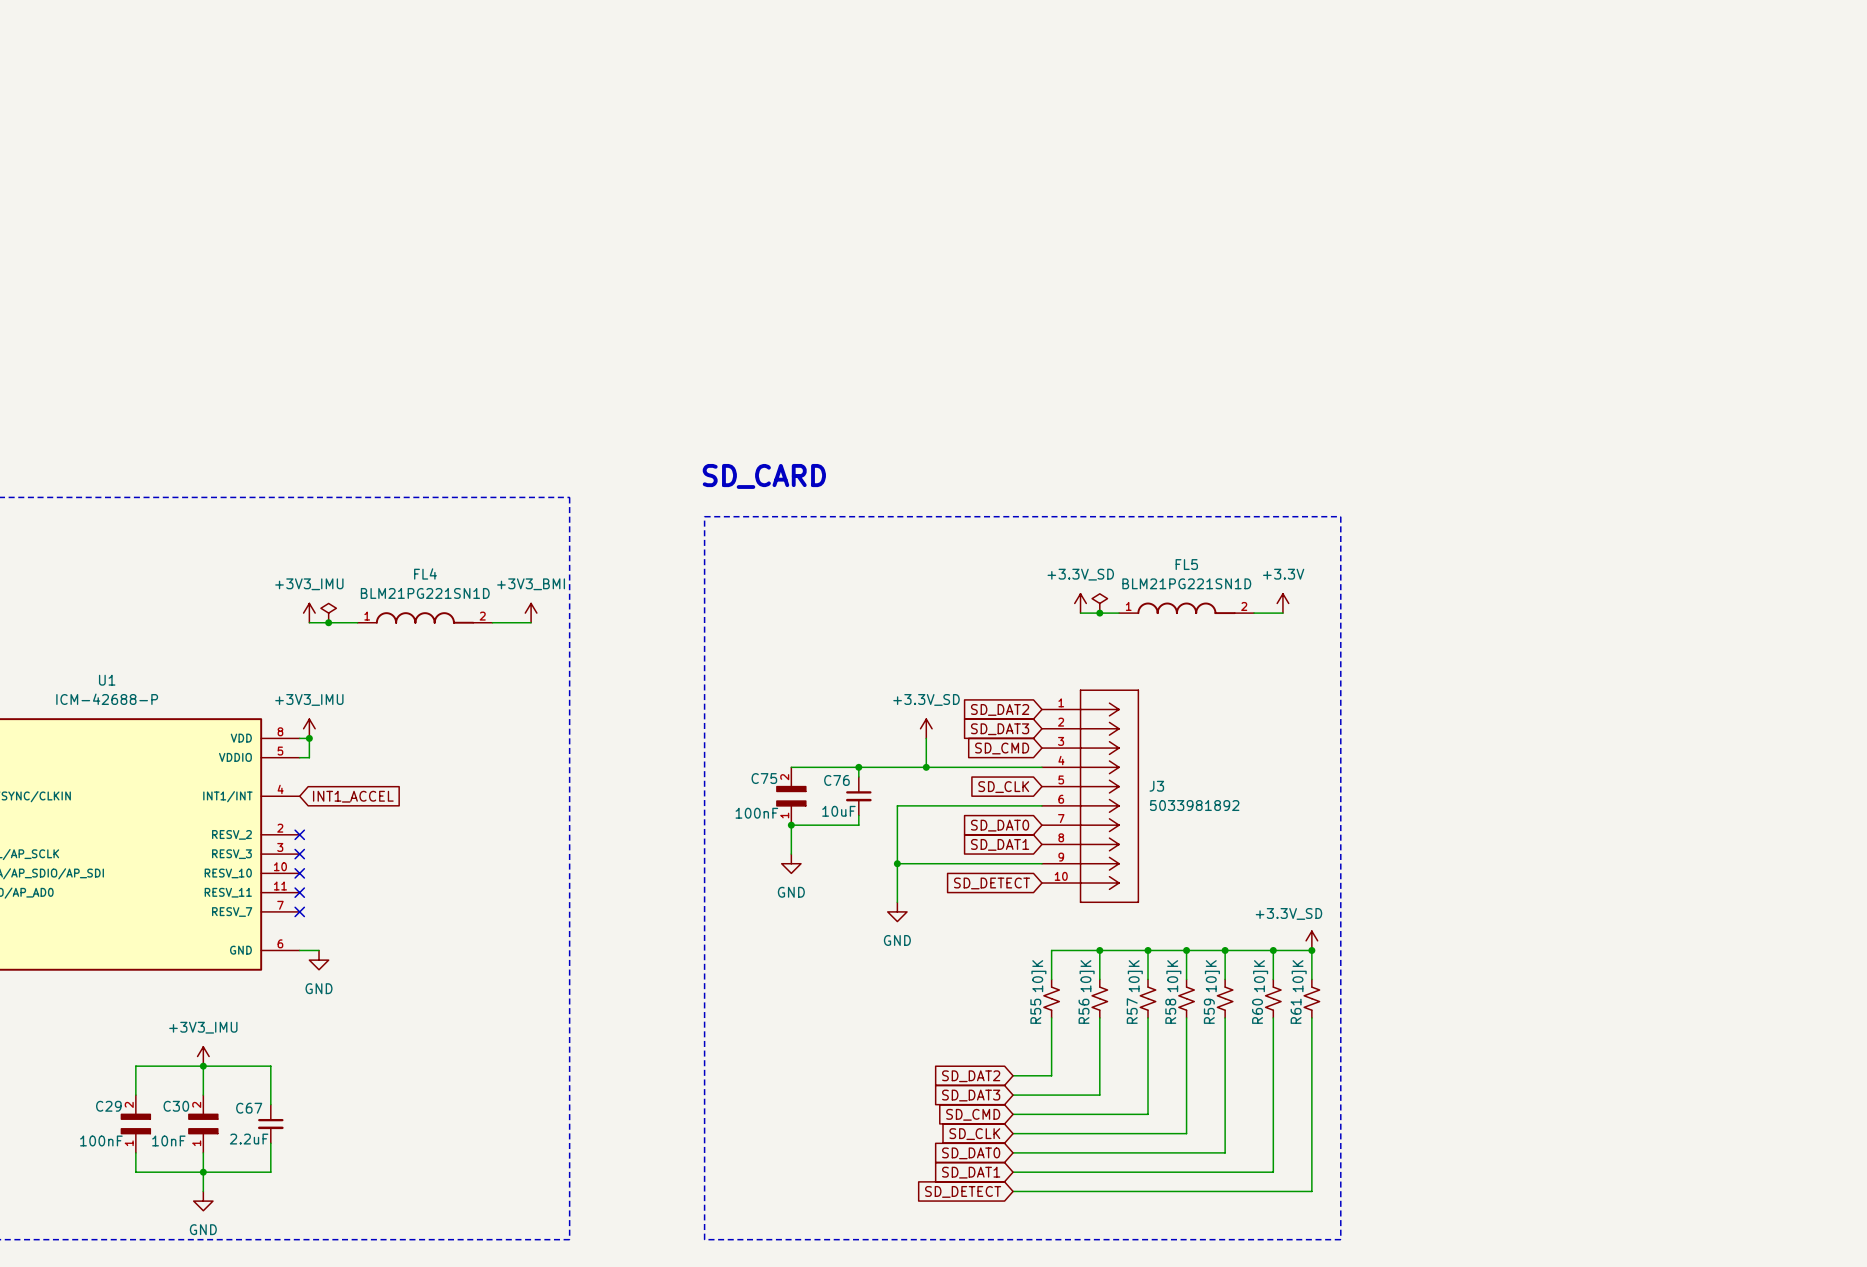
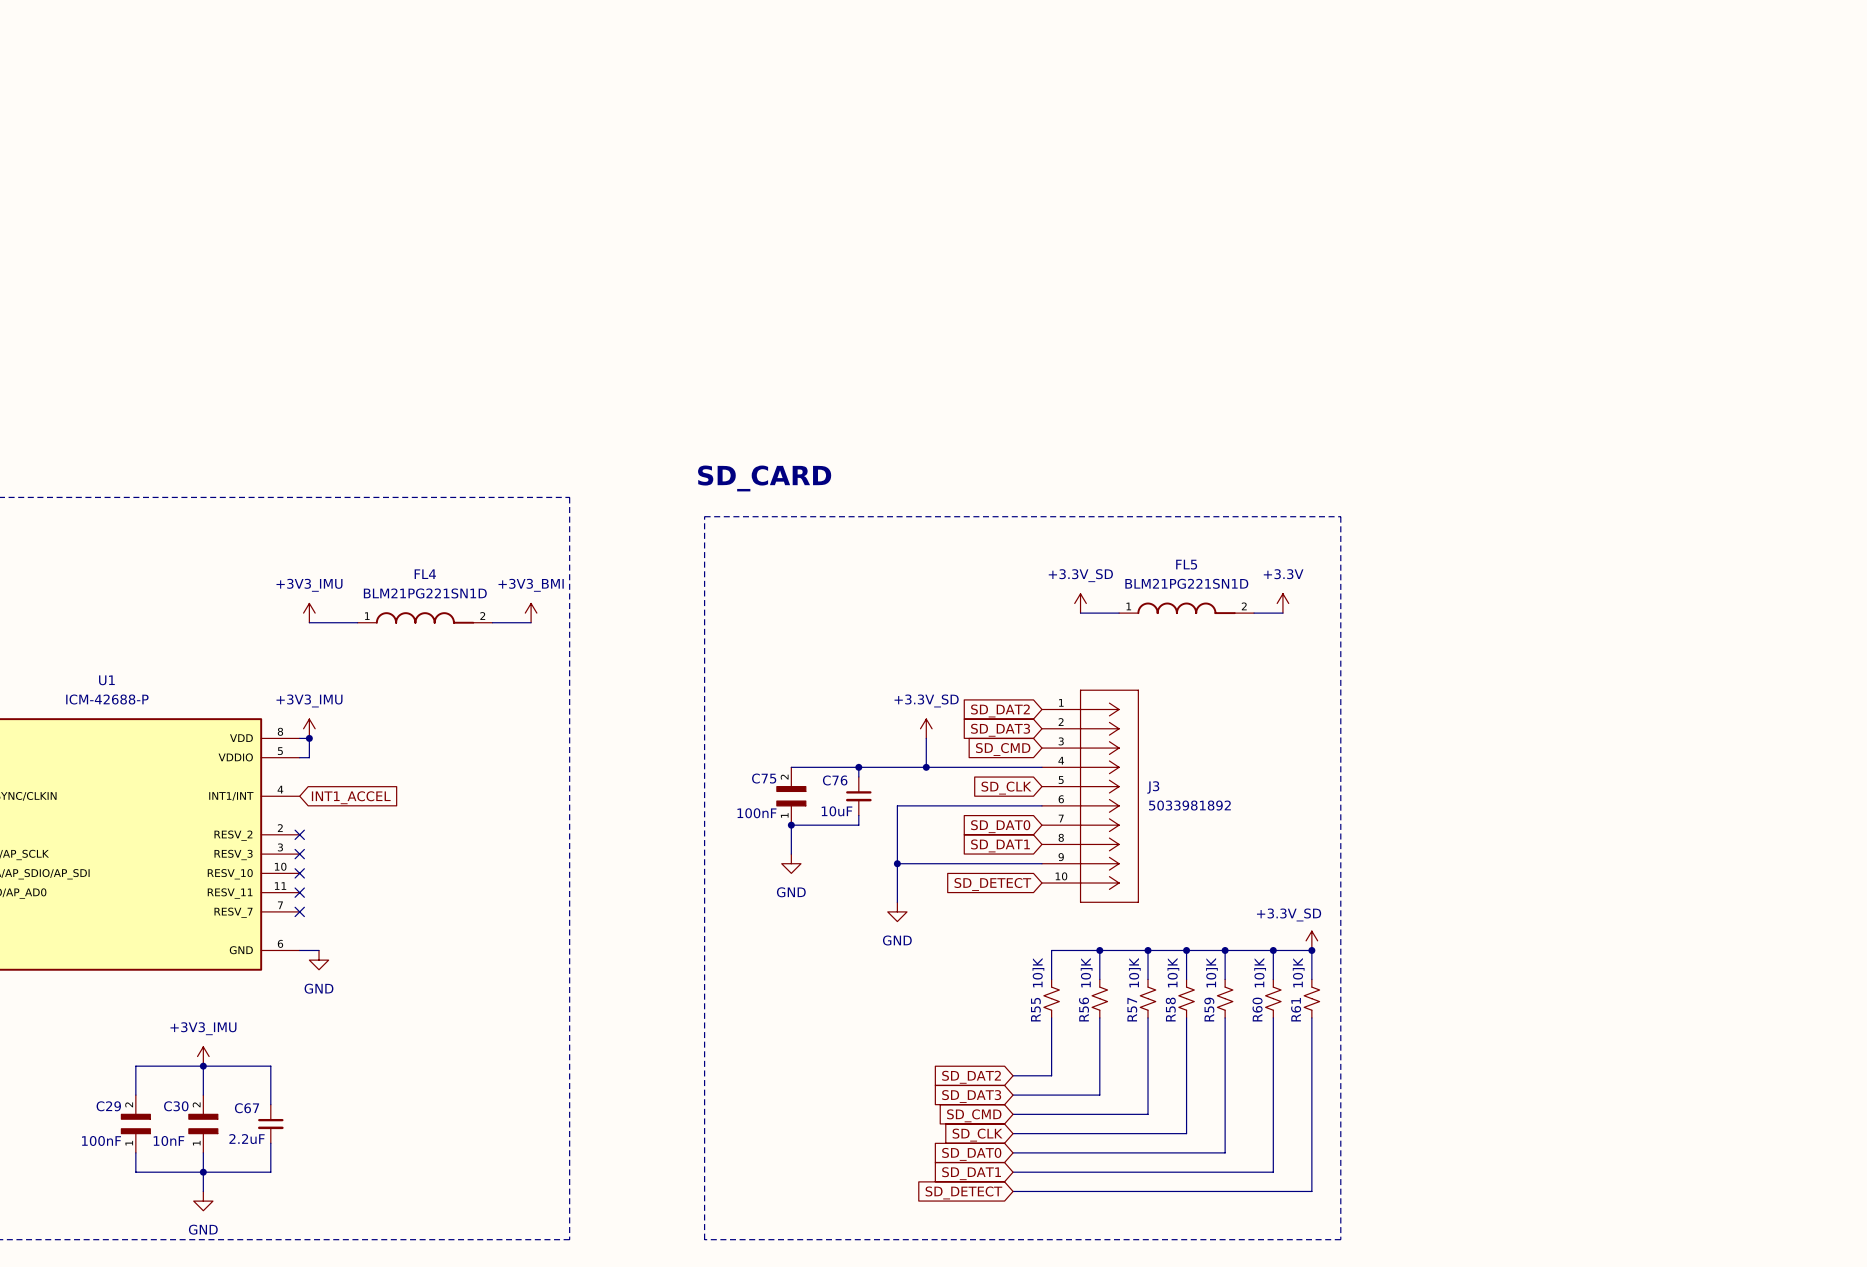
power symbol: (1099, 603) -> none
power symbol: (328, 613) -> none
junction: (1099, 613) -> none
junction: (328, 622) -> none

